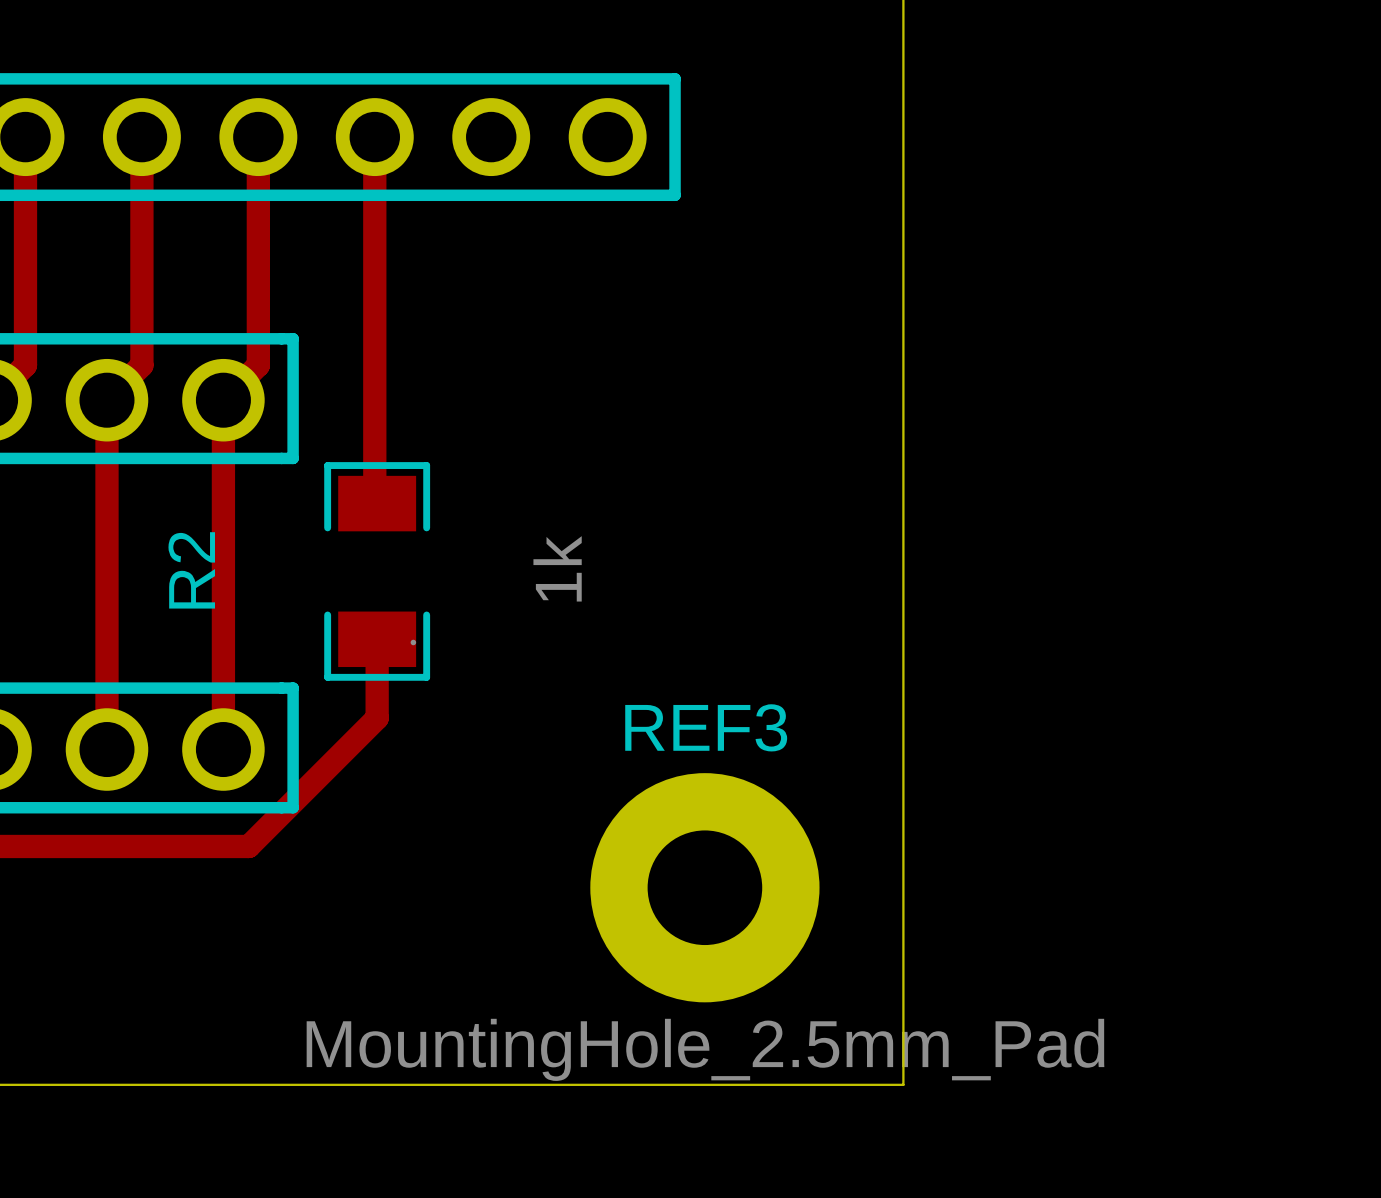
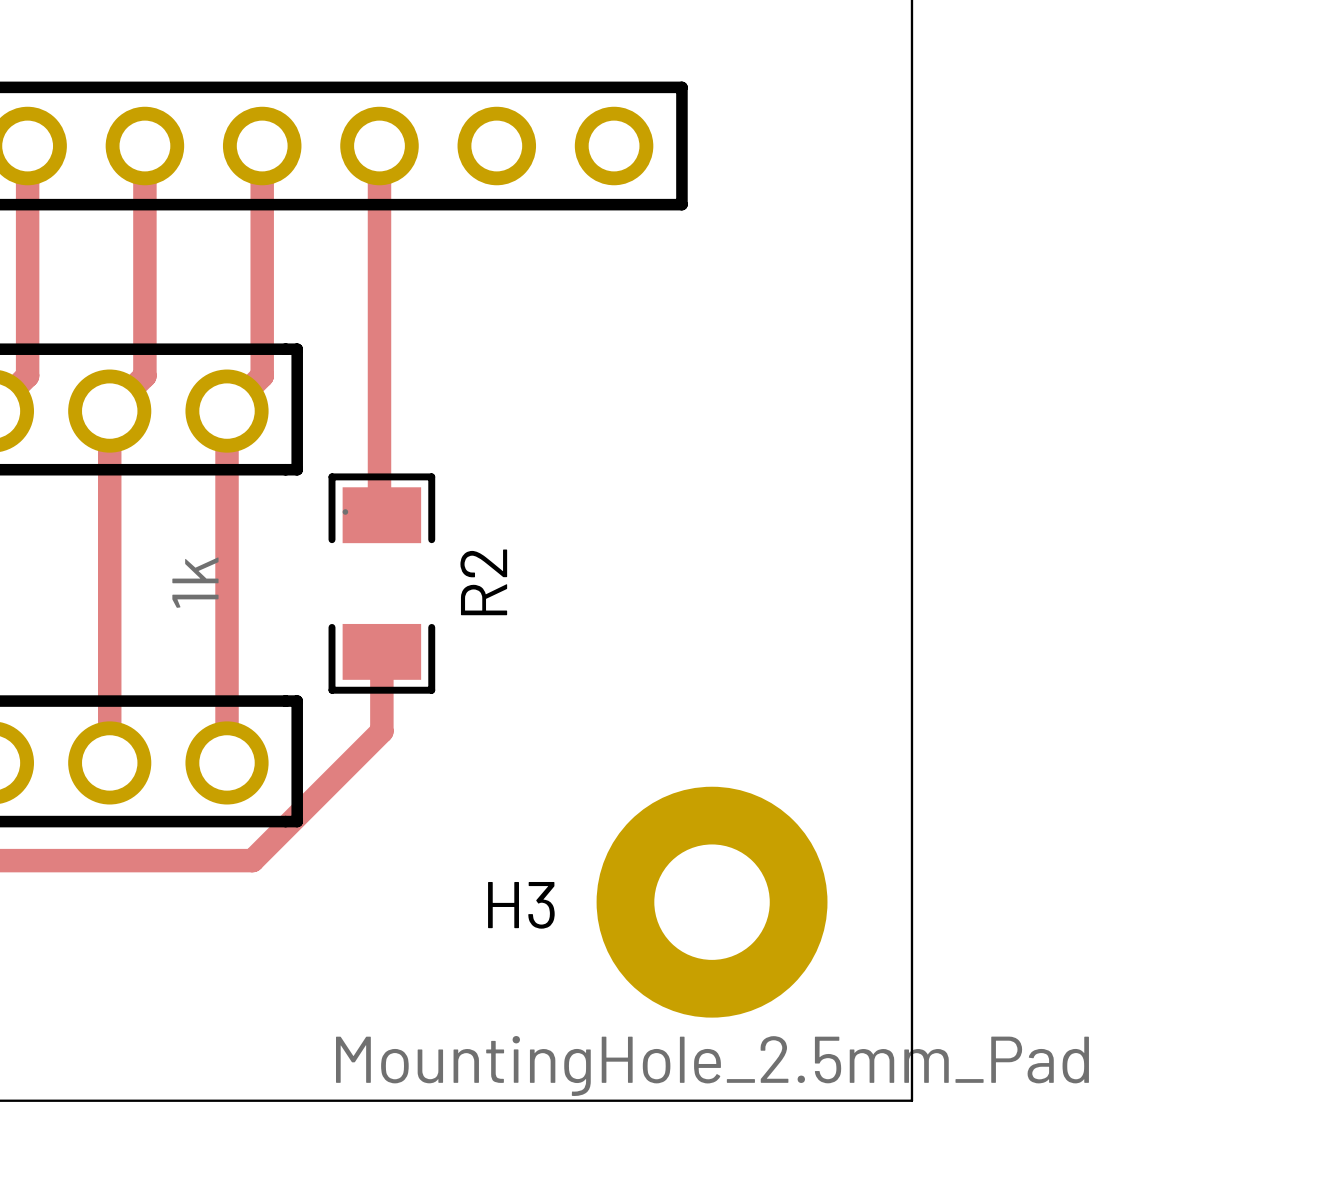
R2 rotation: 0° (377, 571) -> 180° (381, 583)
REF3 name: REF3 (706, 727) -> H3 (521, 905)

